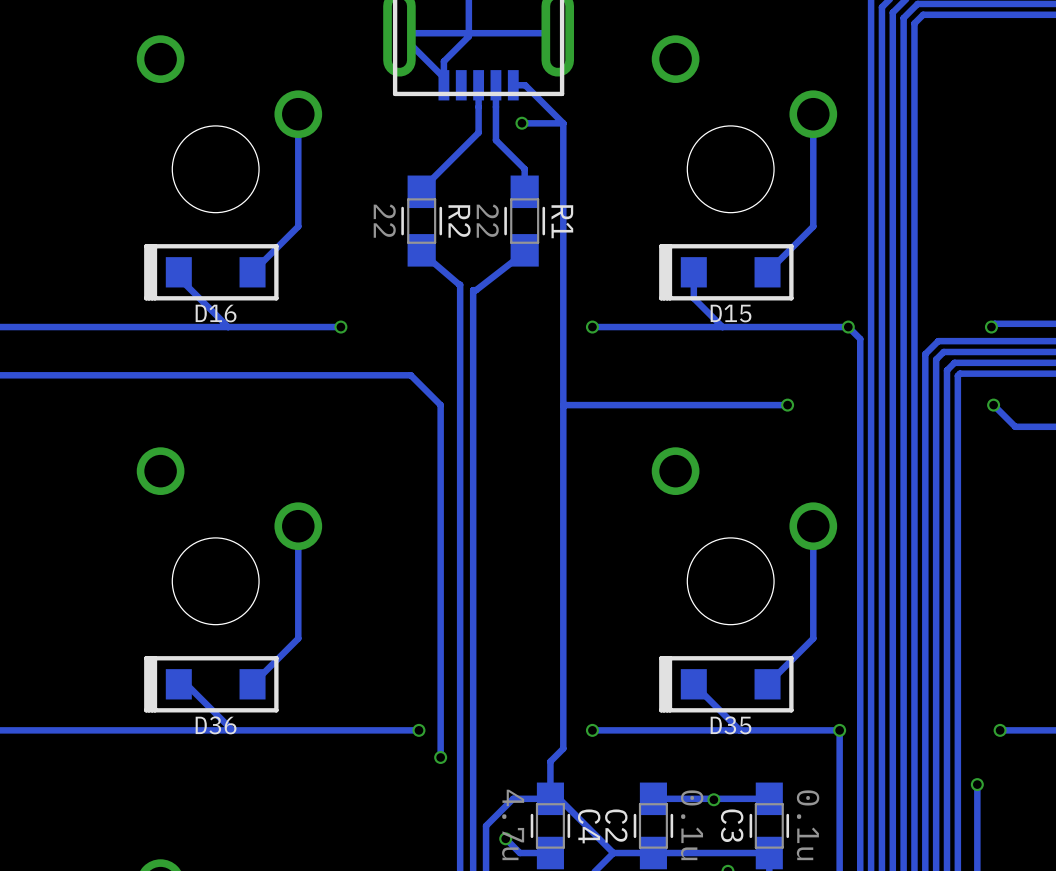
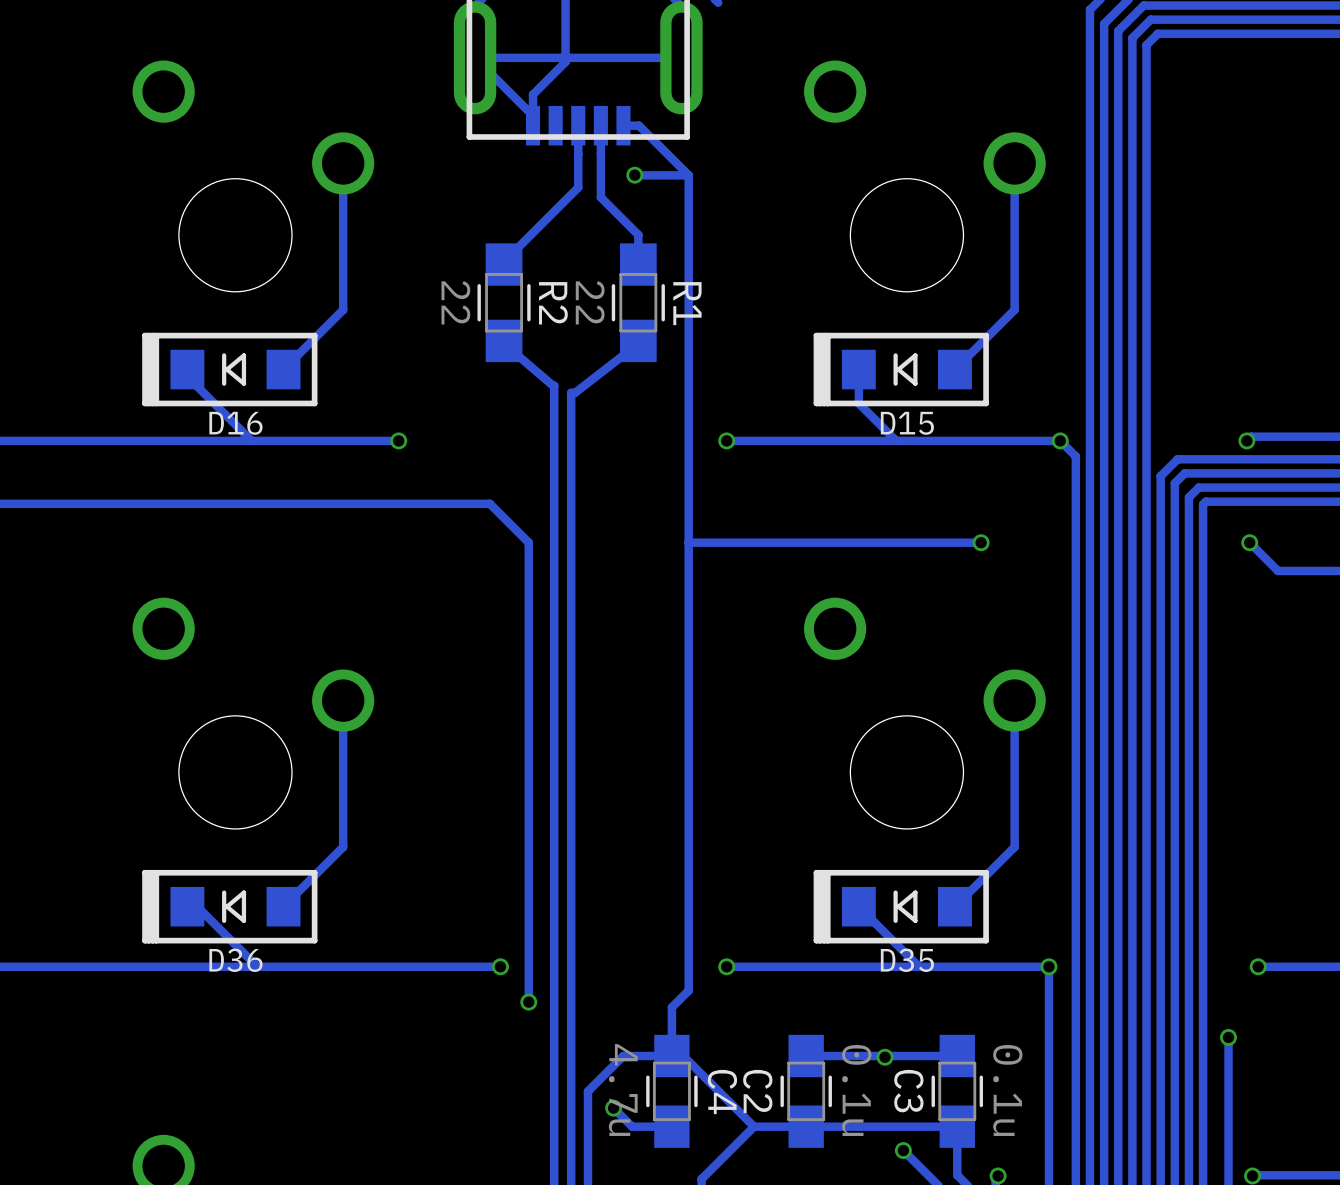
D16 footprint: [144, 244, 279, 301] -> [142, 332, 318, 407]
D15 footprint: [659, 244, 794, 301] -> [813, 332, 989, 407]
D36 footprint: [144, 656, 279, 713] -> [142, 869, 318, 944]
D35 footprint: [659, 656, 794, 713] -> [813, 869, 989, 944]

